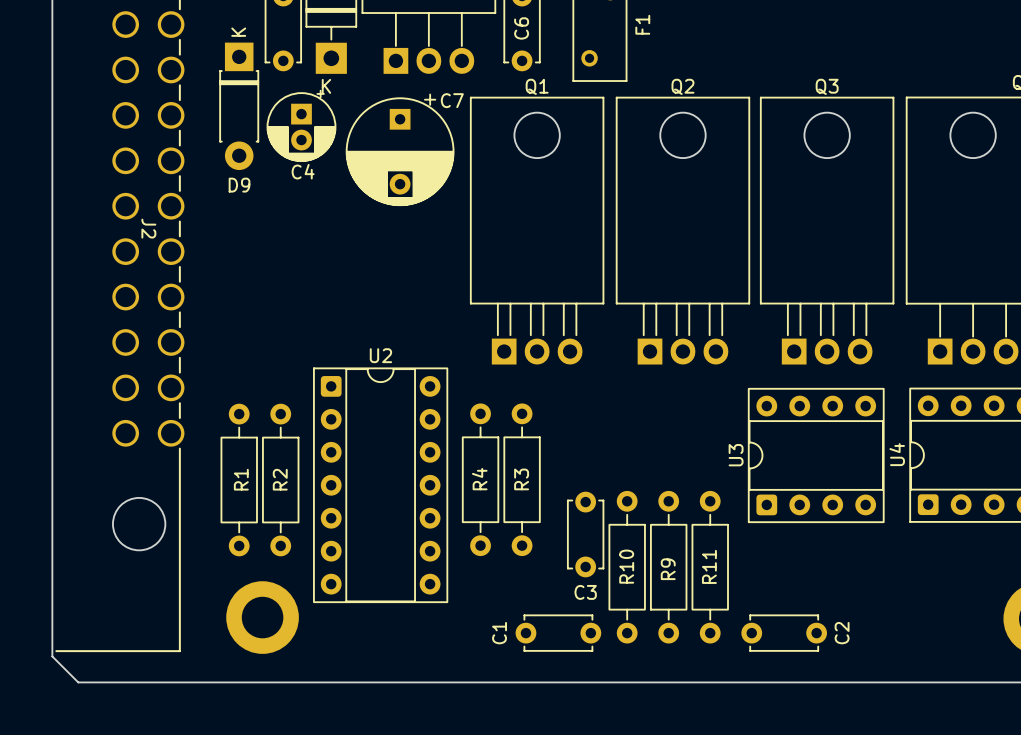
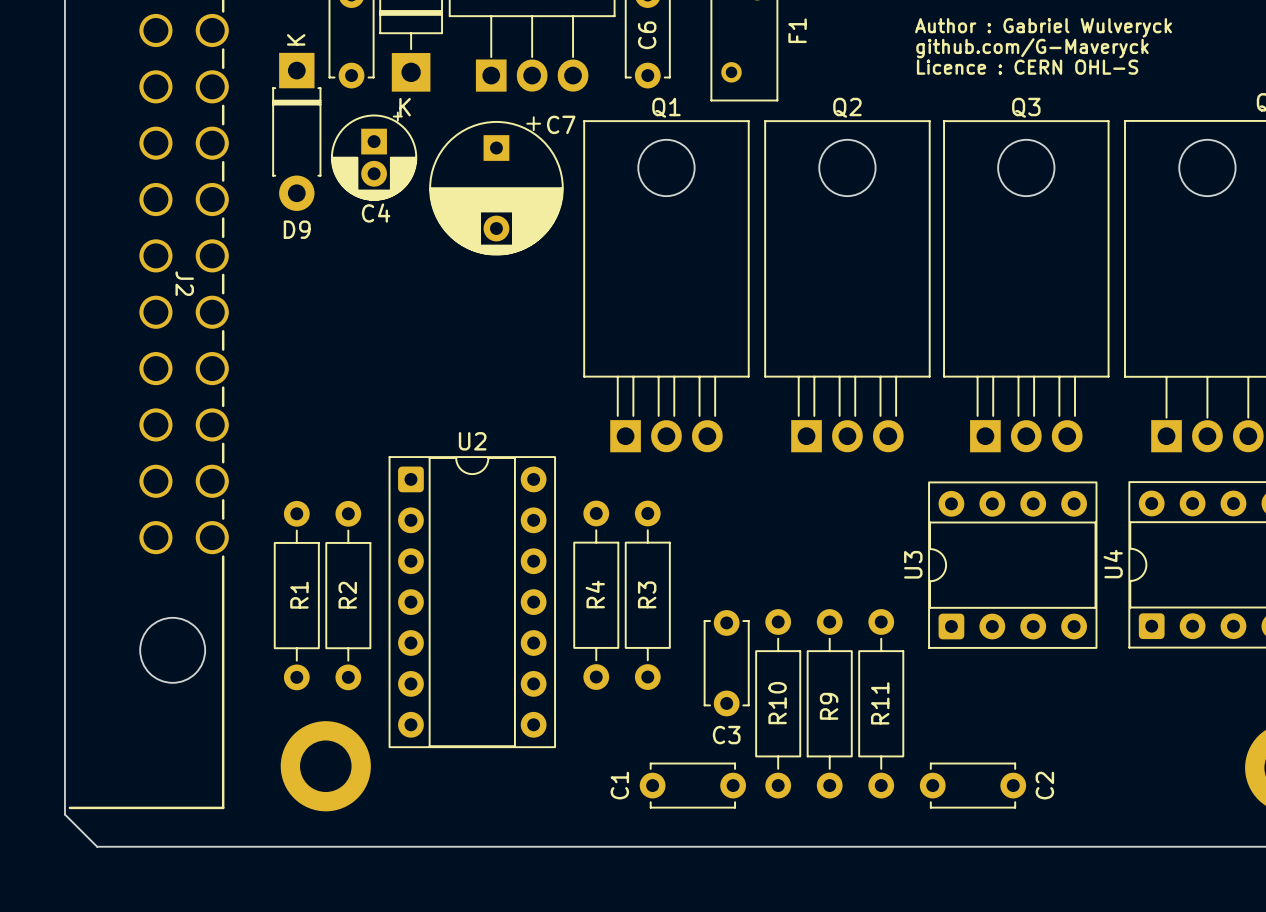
text: none -> Author : Gabriel Wulveryck (1043, 27)
text: none -> github.com/G-Maveryck (1032, 48)
text: none -> Licence : CERN OHL-S (1027, 67)

